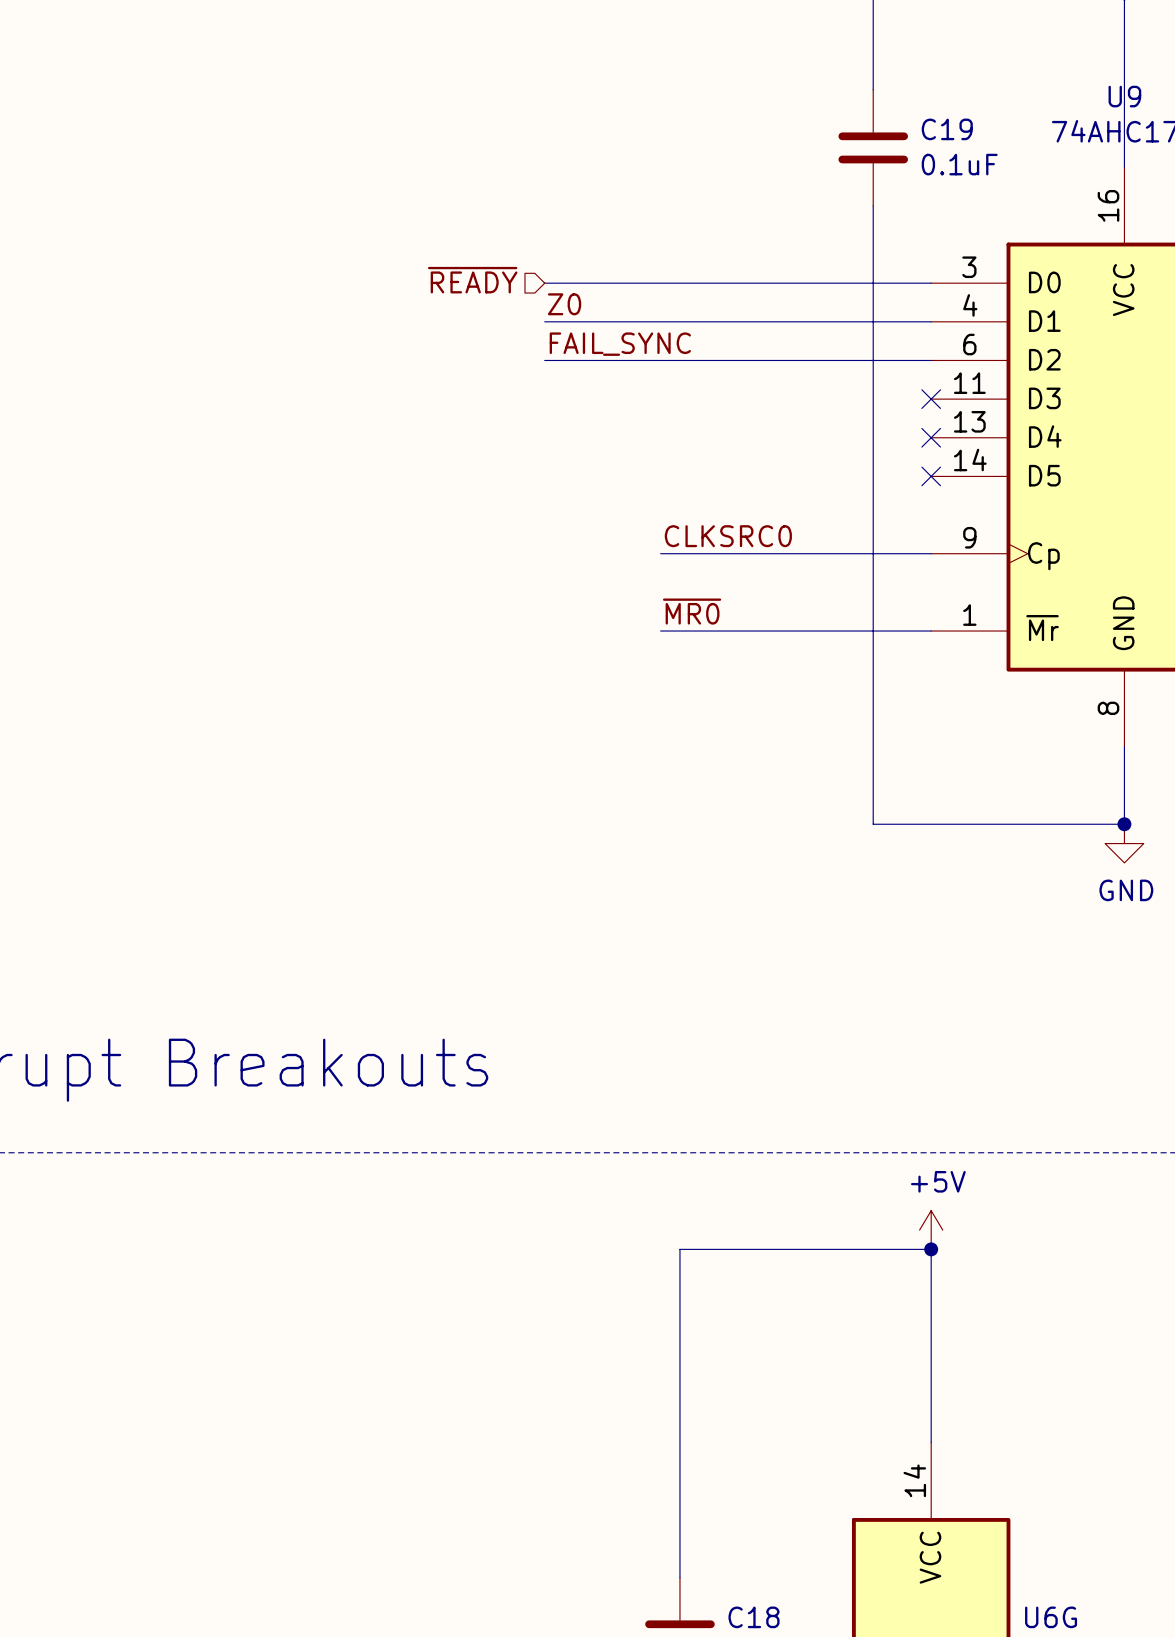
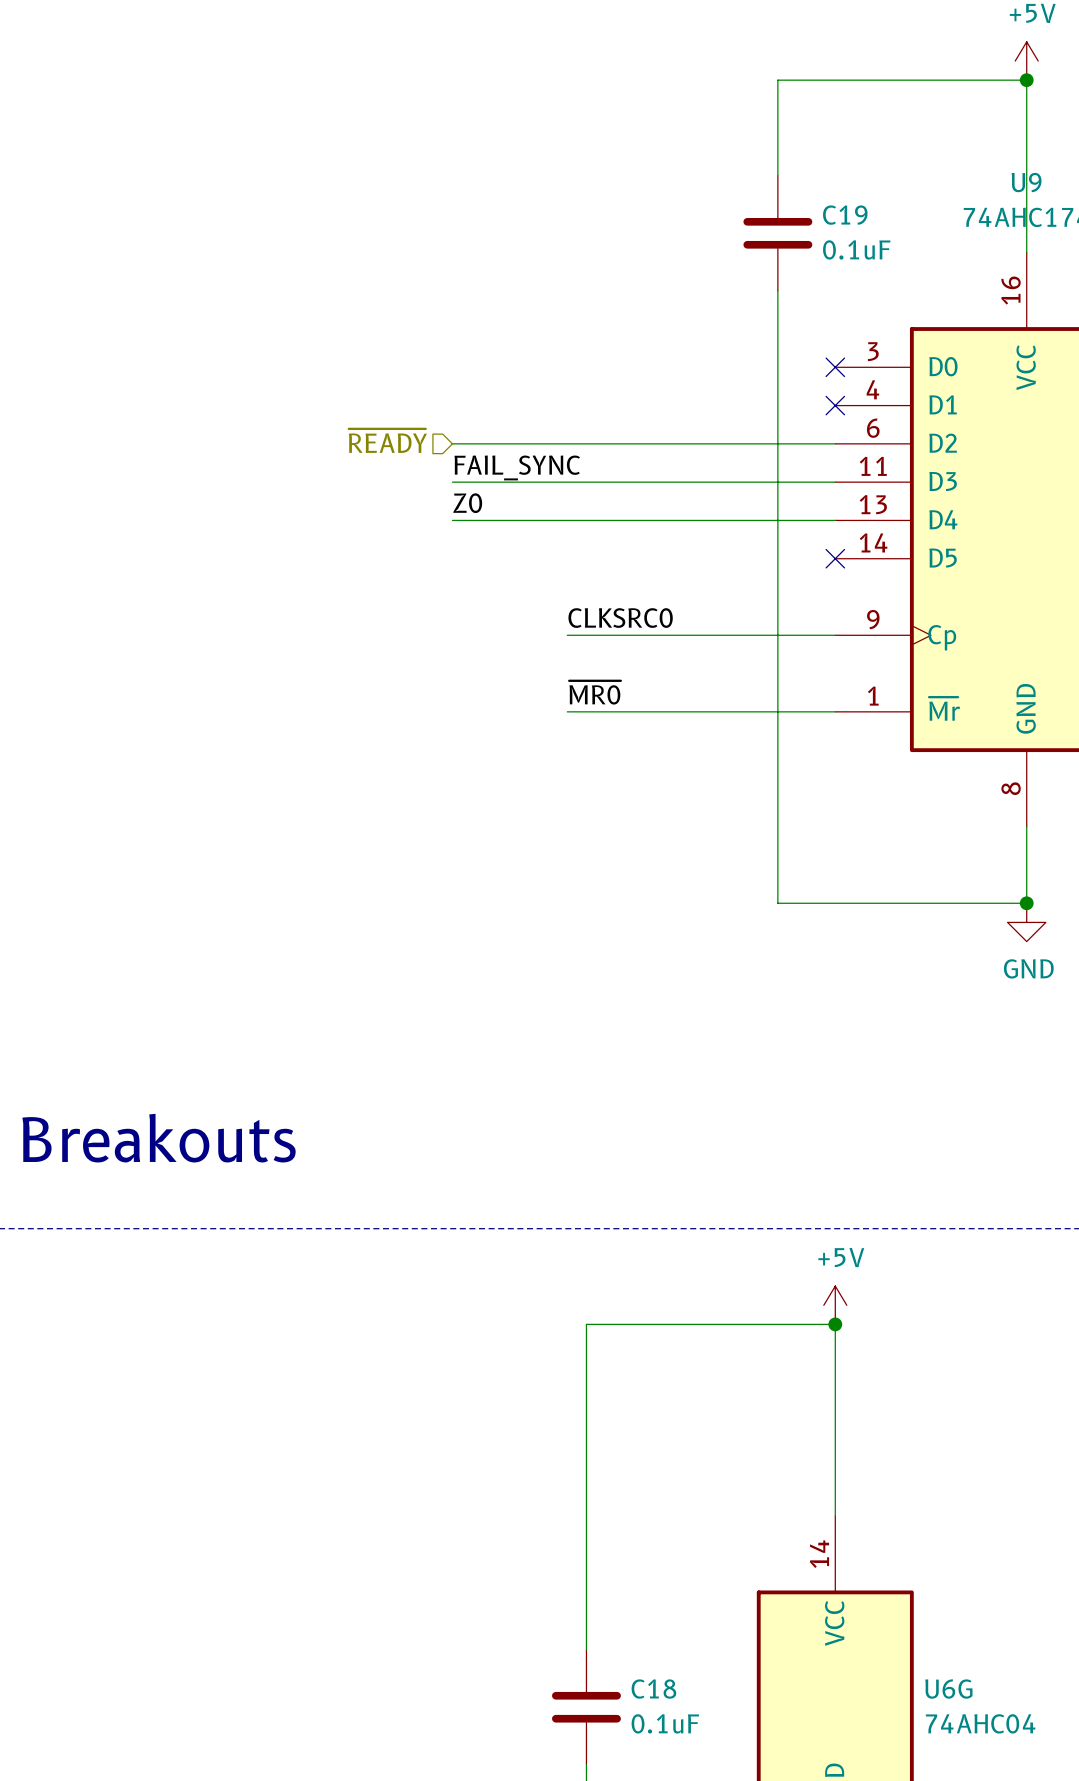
hierarchical label position: ~{READY} (472, 280) -> ~{READY} (387, 440)
wire: (544, 283) (931, 283) -> (452, 482) (835, 482)
no-connect mark: none -> (835, 367)
label position: Z0 (564, 304) -> Z0 (467, 503)
wire: (544, 321) (931, 321) -> (452, 520) (835, 520)
no-connect mark: none -> (835, 405)
label position: FAIL_SYNC (620, 344) -> FAIL_SYNC (517, 467)
no-connect mark: (931, 399) -> none
no-connect mark: (931, 437) -> none

